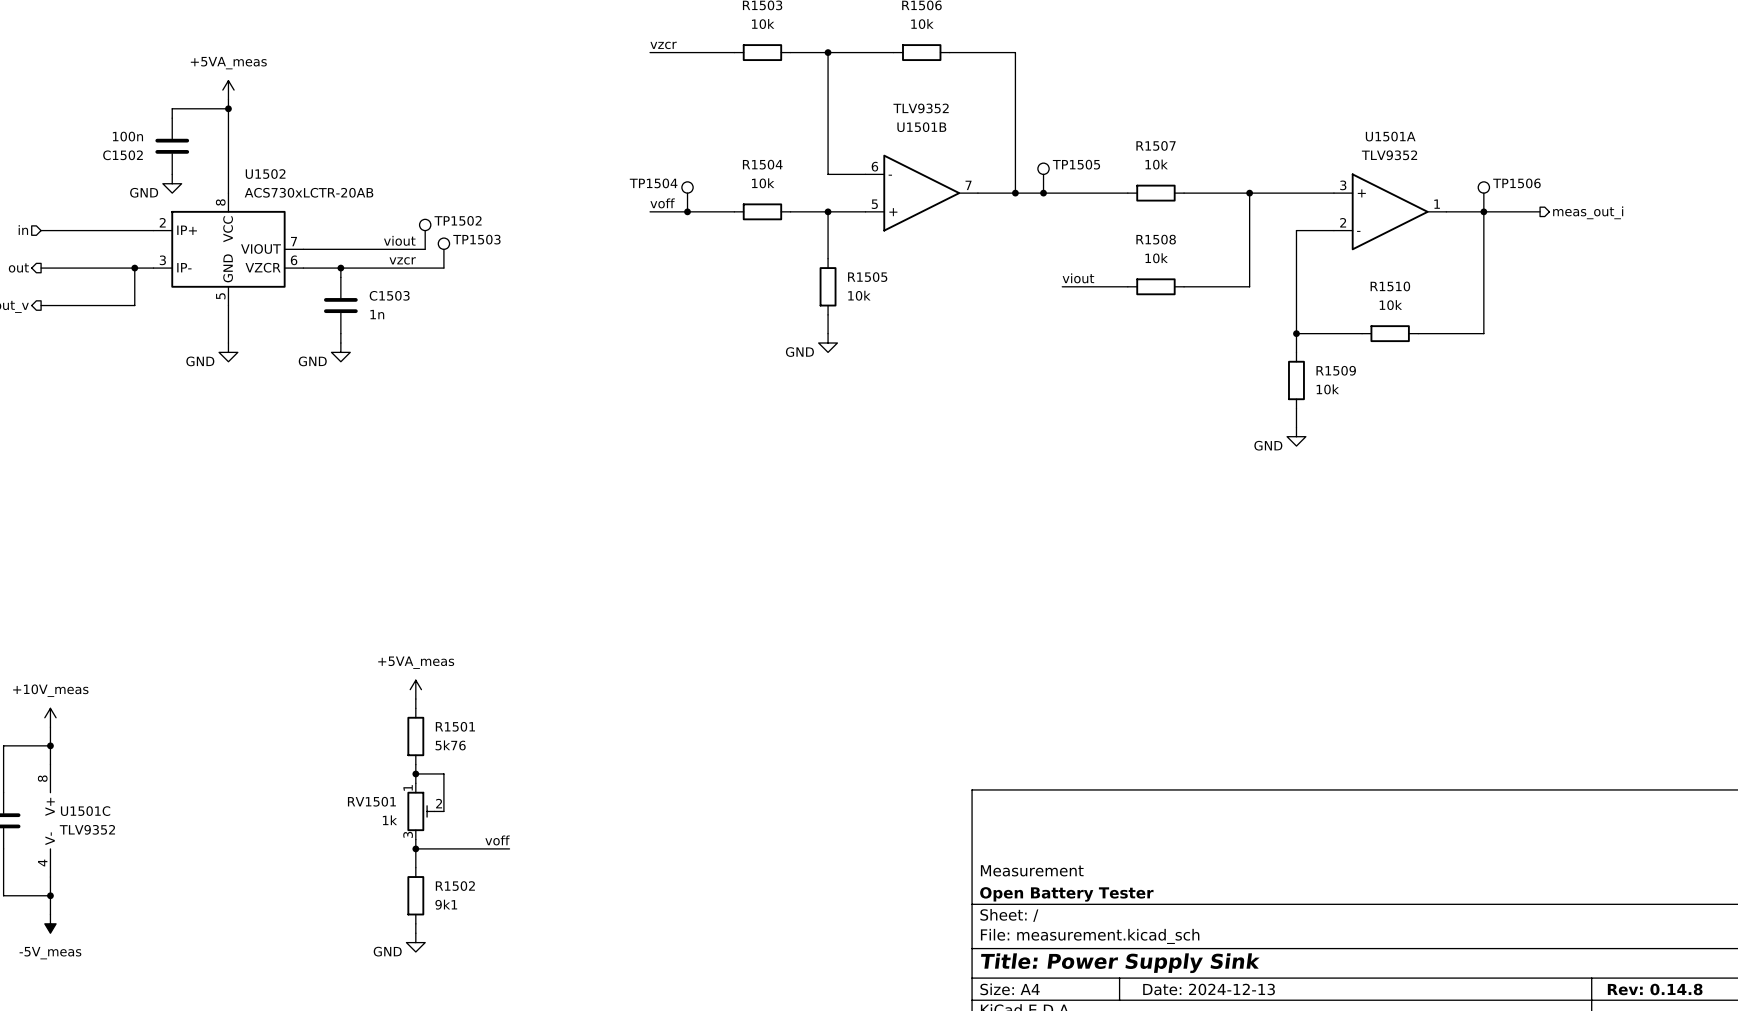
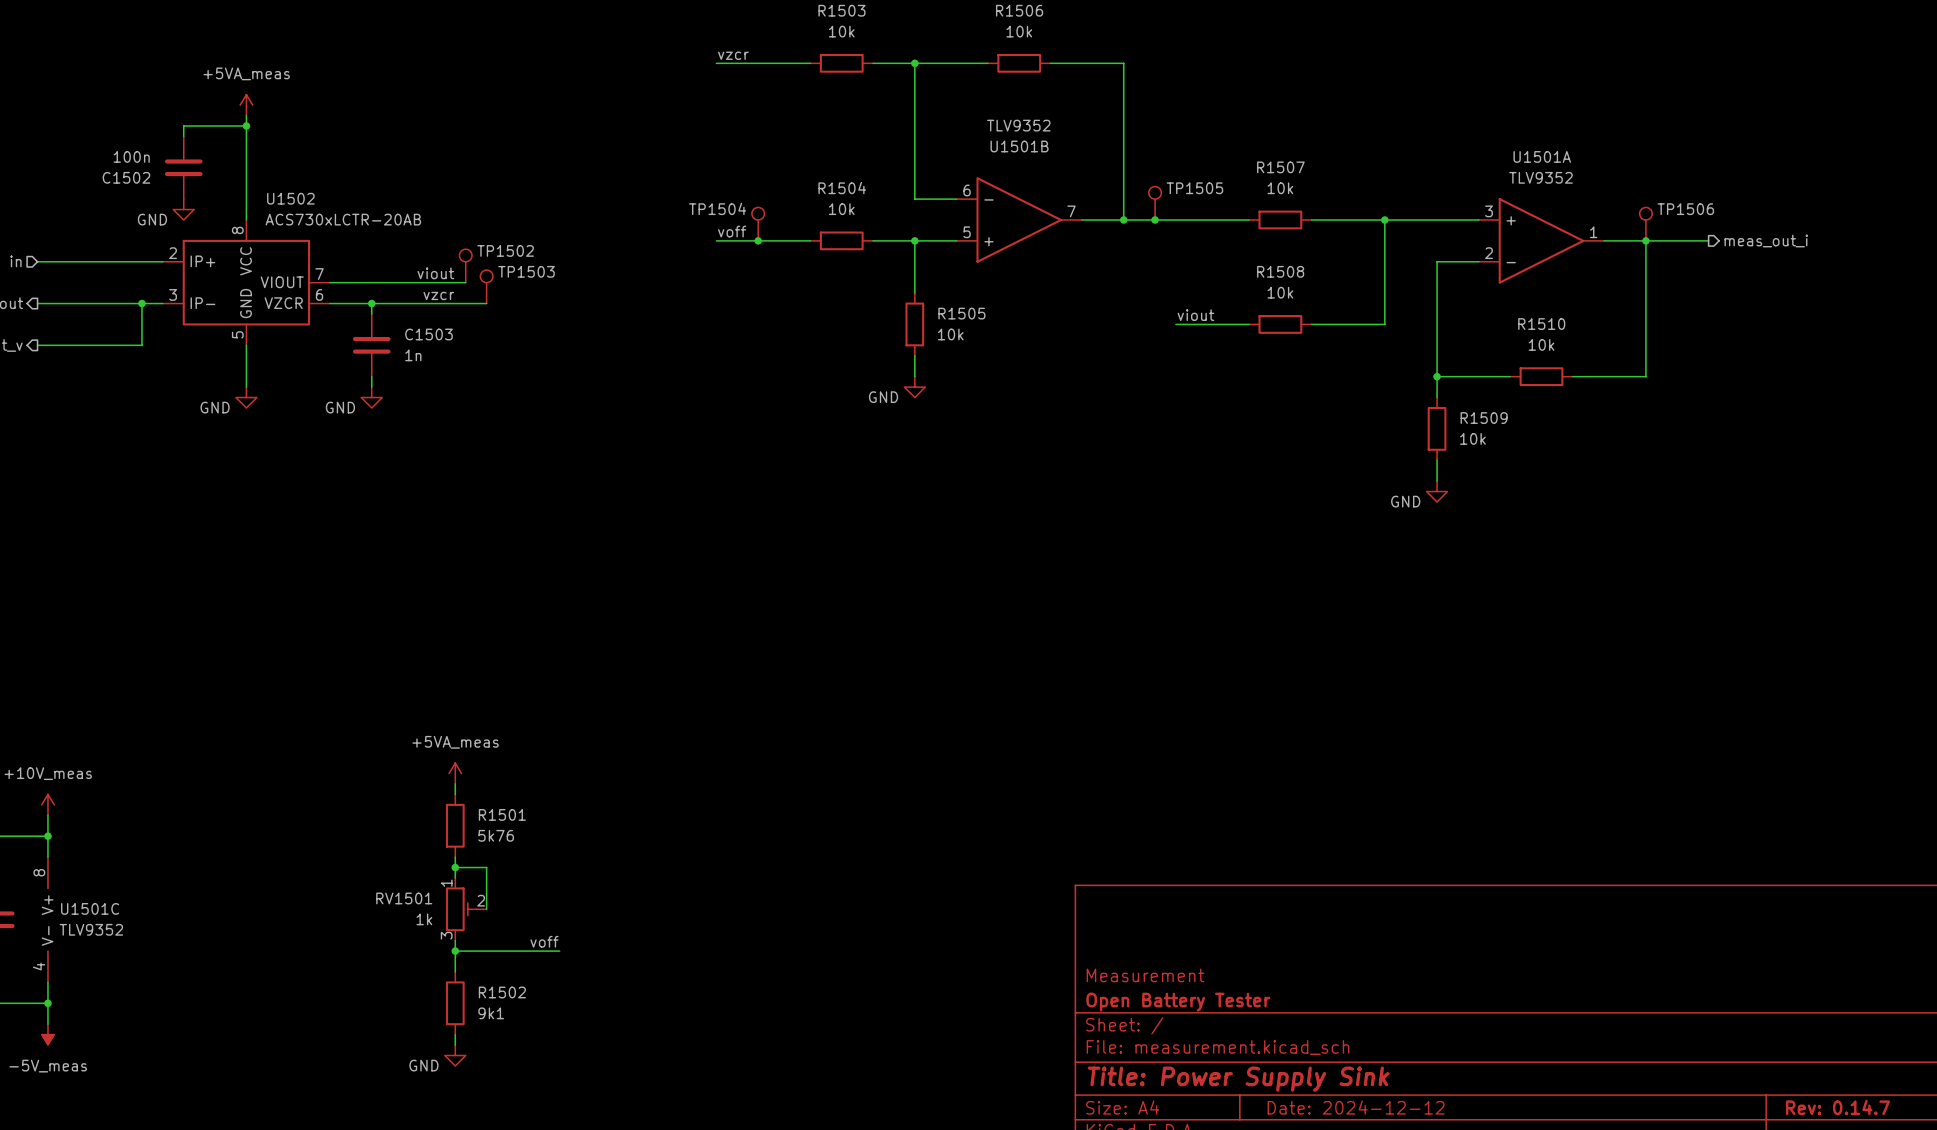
title block: Date: 2024-12-13 (1209, 989) -> Date: 2024-12-12 (1356, 1107)
title block: Rev: 0.14.8 (1655, 989) -> Rev: 0.14.7 (1837, 1107)

